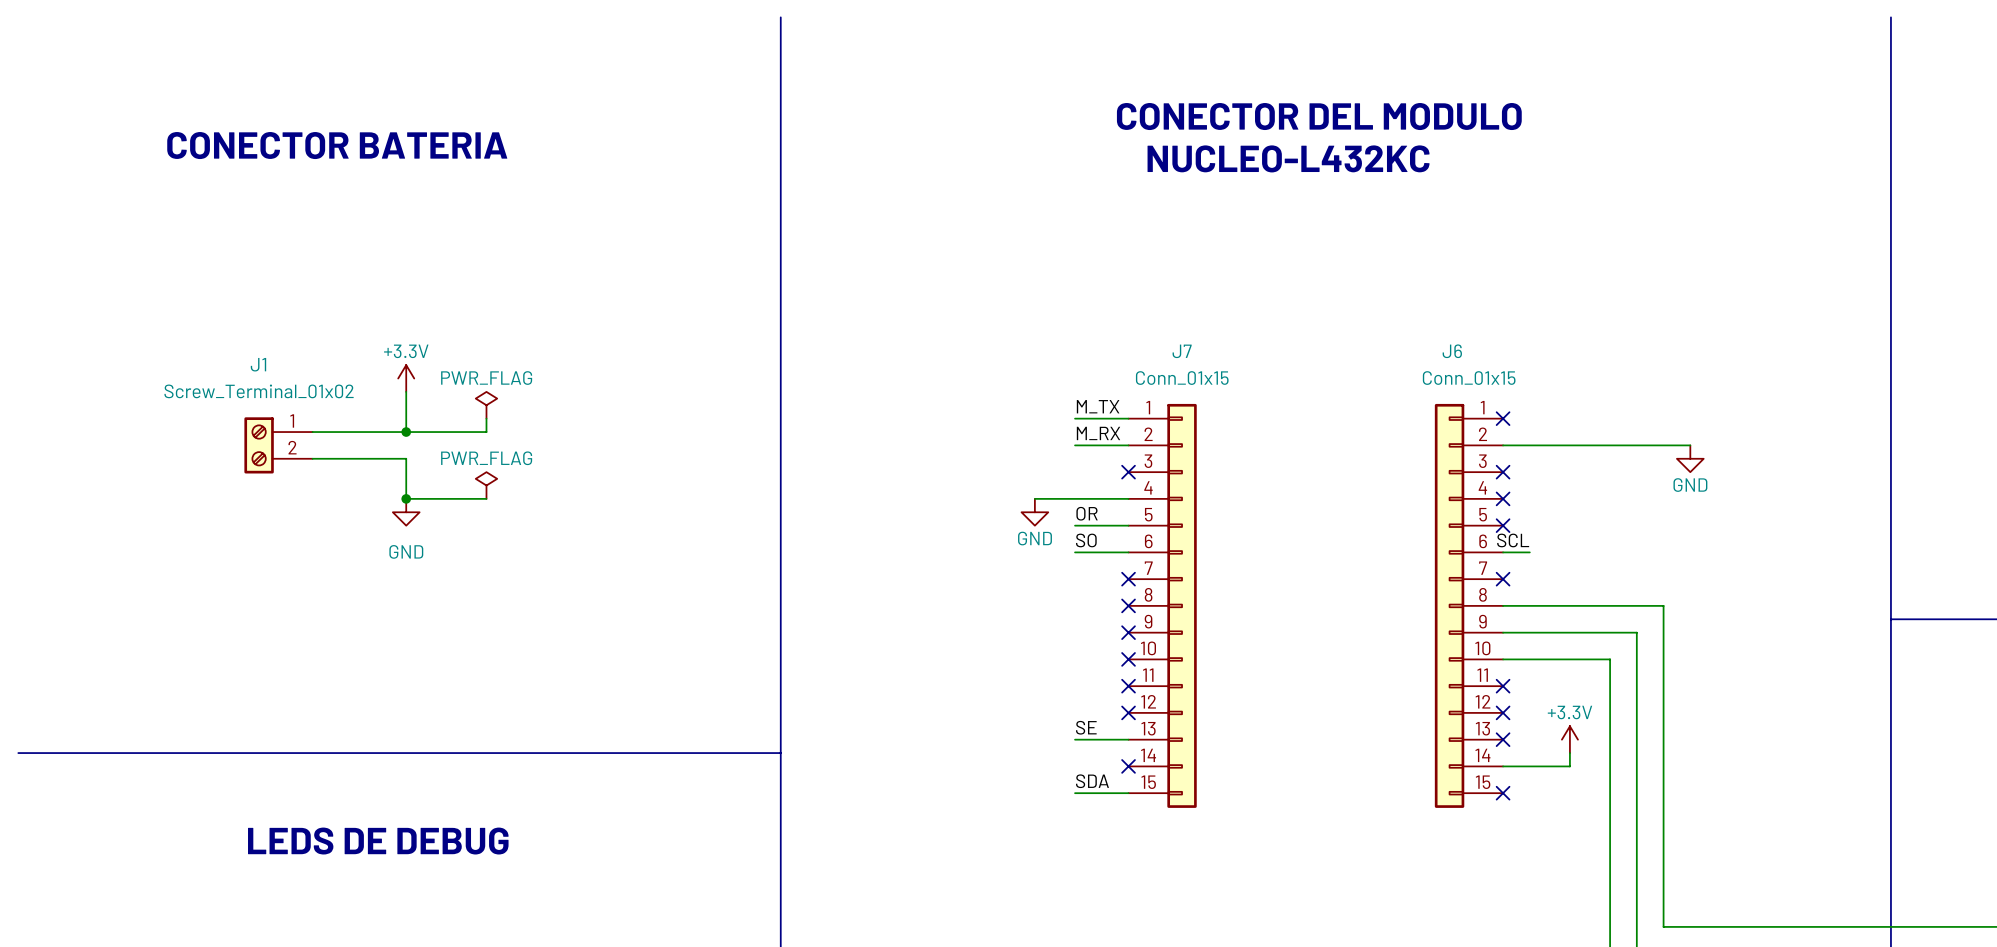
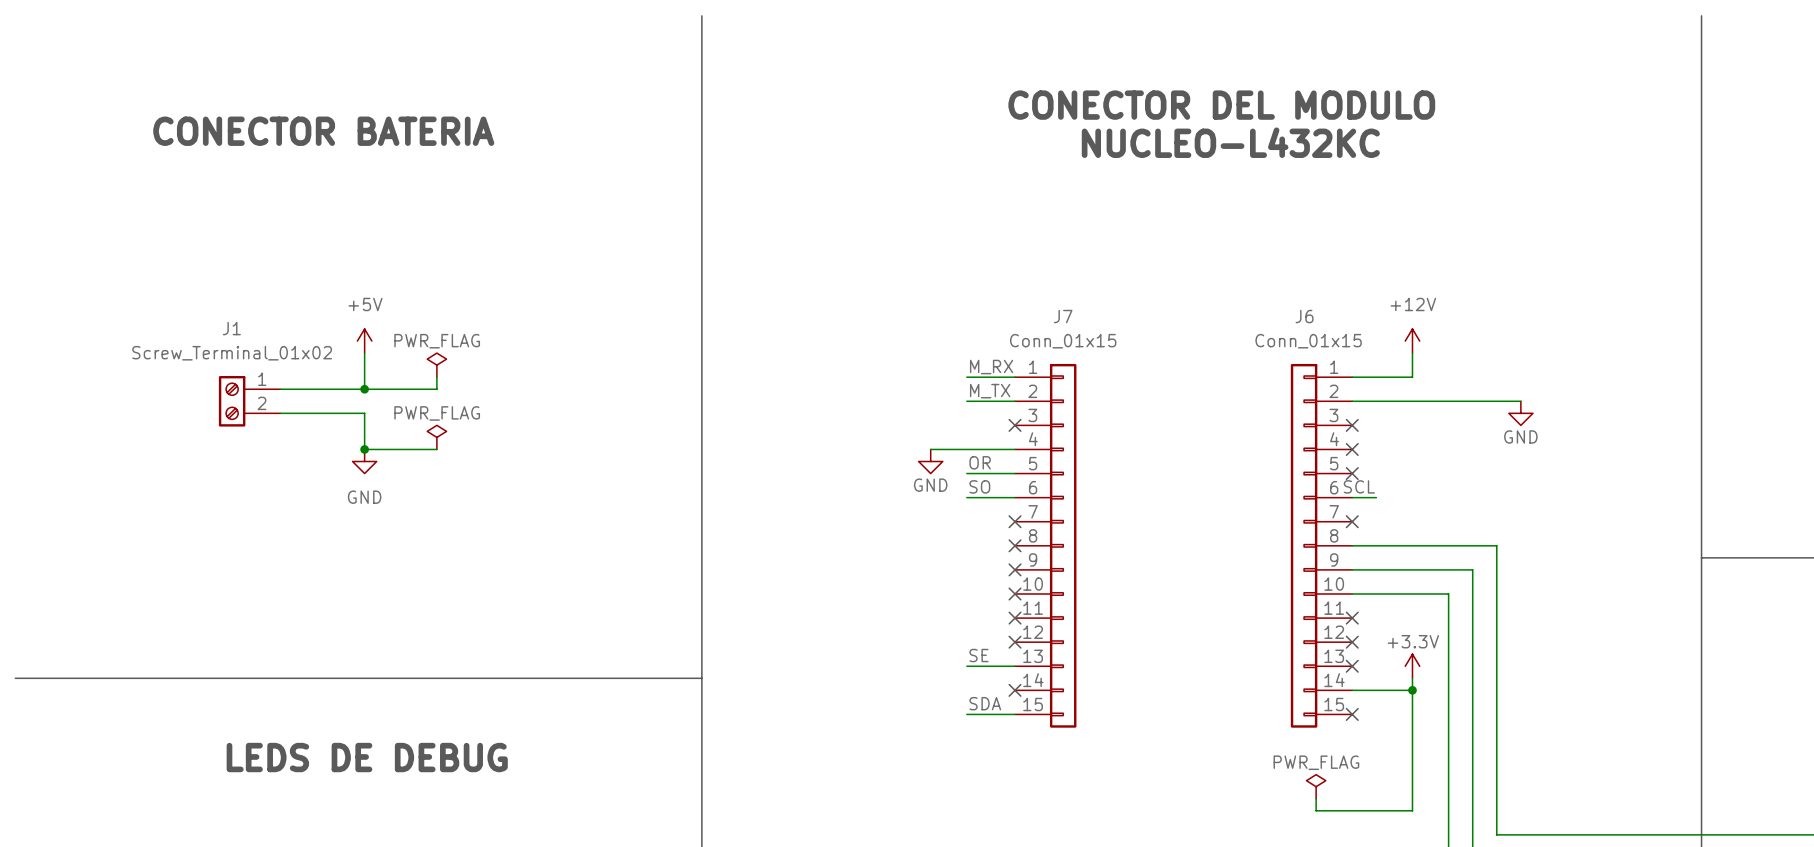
power symbol: +3.3V (406, 378) -> +5V (364, 341)
power symbol: none -> +12V (1412, 341)
wire: none -> (1412, 353) (1412, 377) (1352, 377)
label: M_TX (1098, 406) -> M_RX (991, 367)
no-connect mark: (1503, 418) -> none
label: M_RX (1098, 433) -> M_TX (990, 391)
wire: none -> (1412, 690) (1412, 810) (1316, 810) (1316, 798)
junction: none -> (1412, 690)
power symbol: none -> PWR_FLAG (1316, 786)

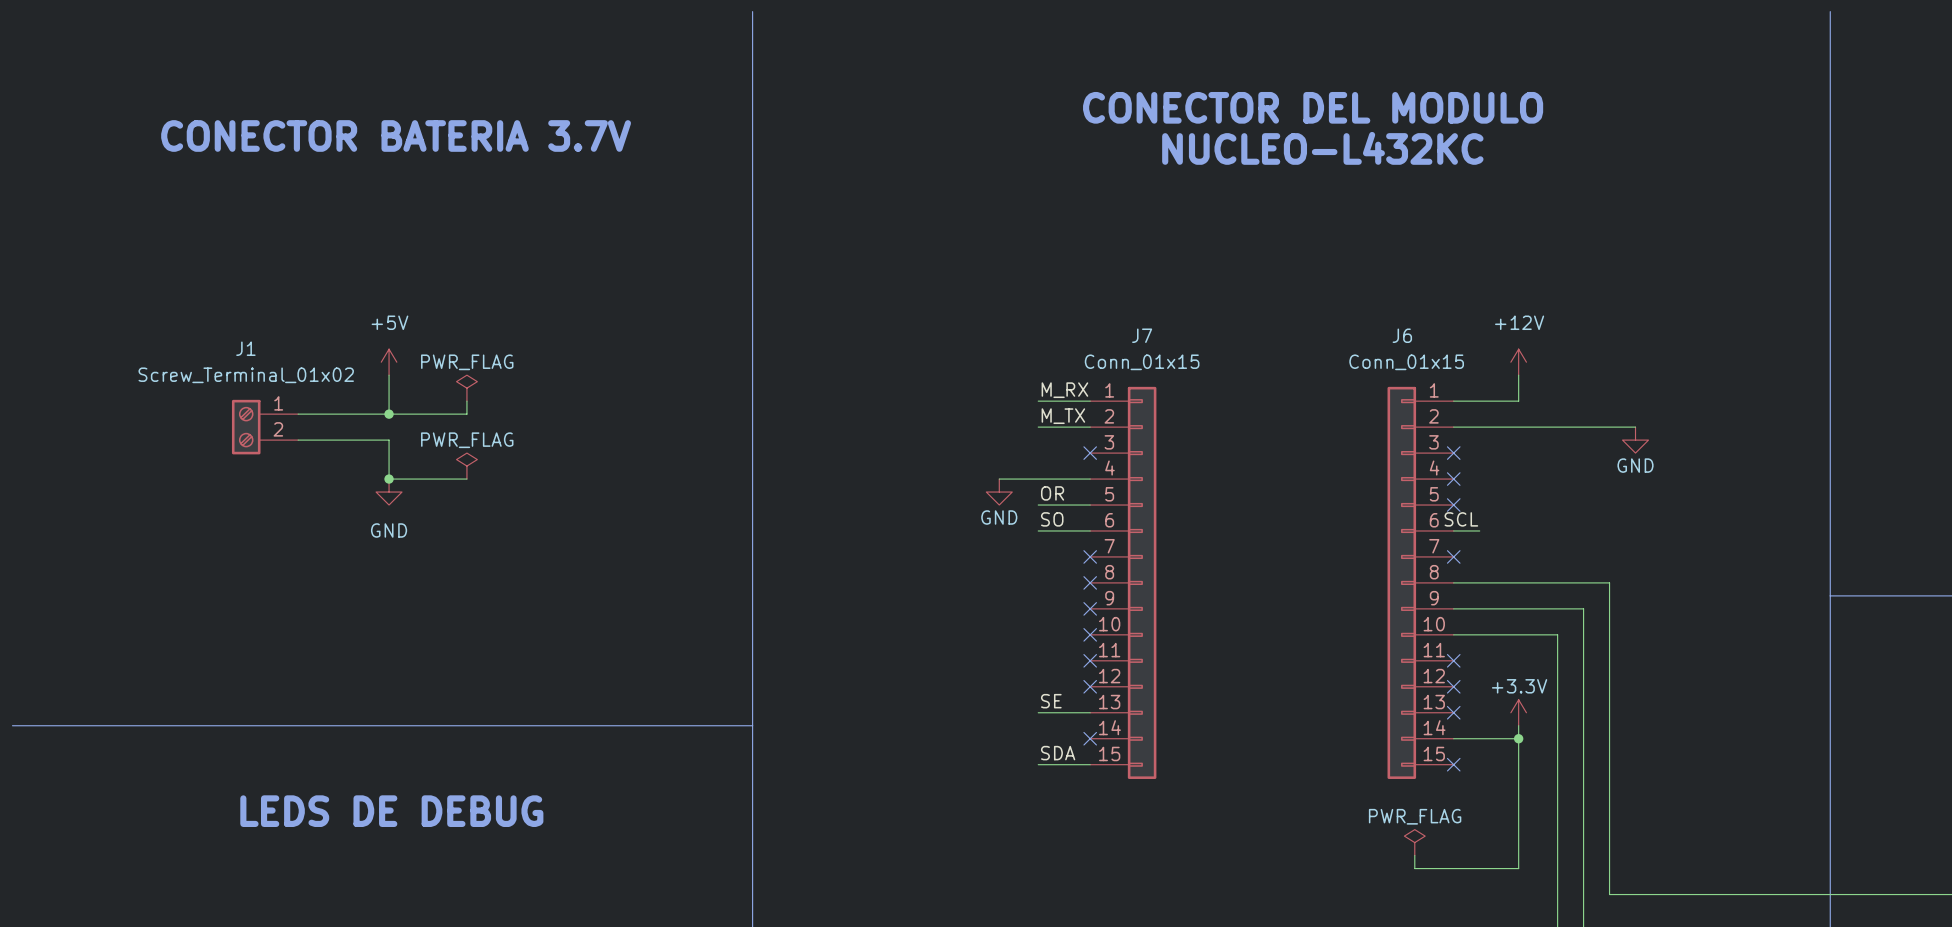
text: CONECTOR BATERIA (323, 131) -> CONECTOR BATERIA 3.7V (396, 135)

